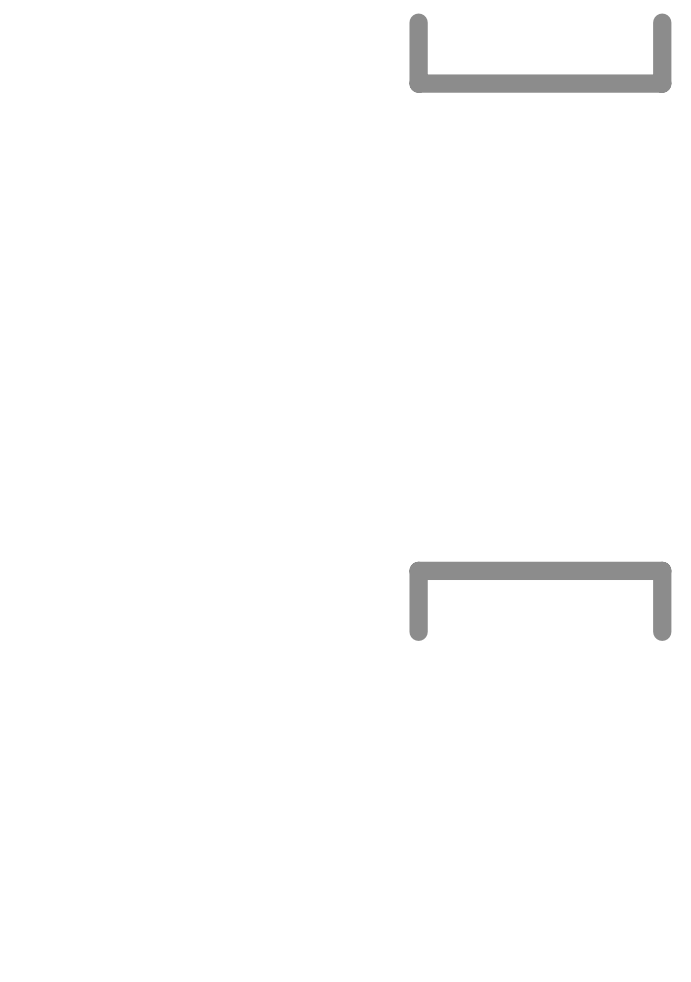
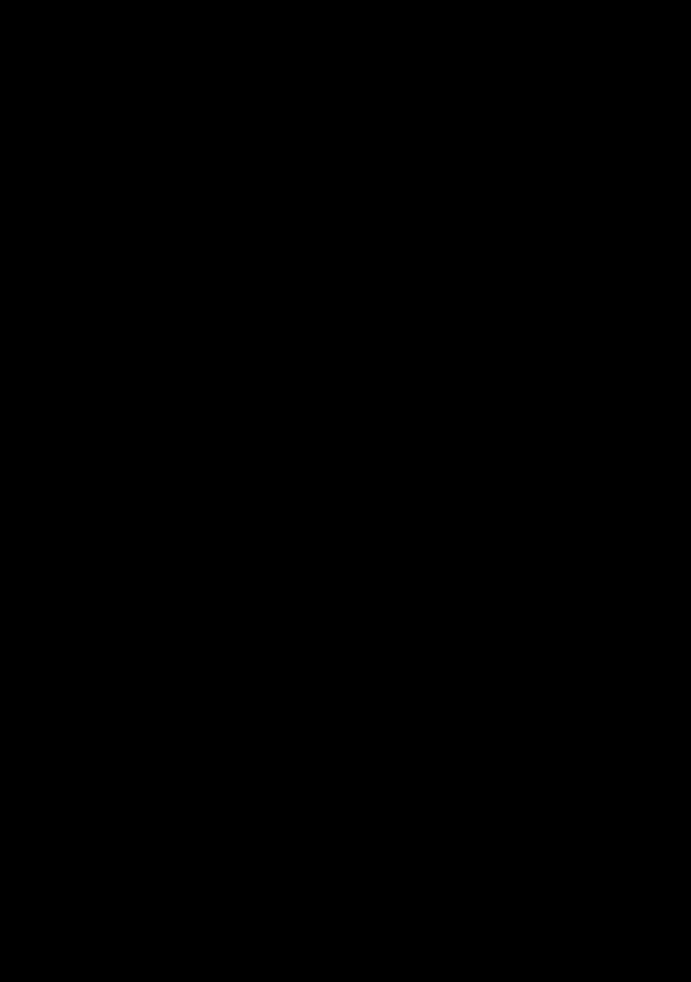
line: (418, 22) (418, 83) (662, 83) (662, 22) -> none
line: (418, 631) (418, 570) (662, 570) (662, 631) -> none

